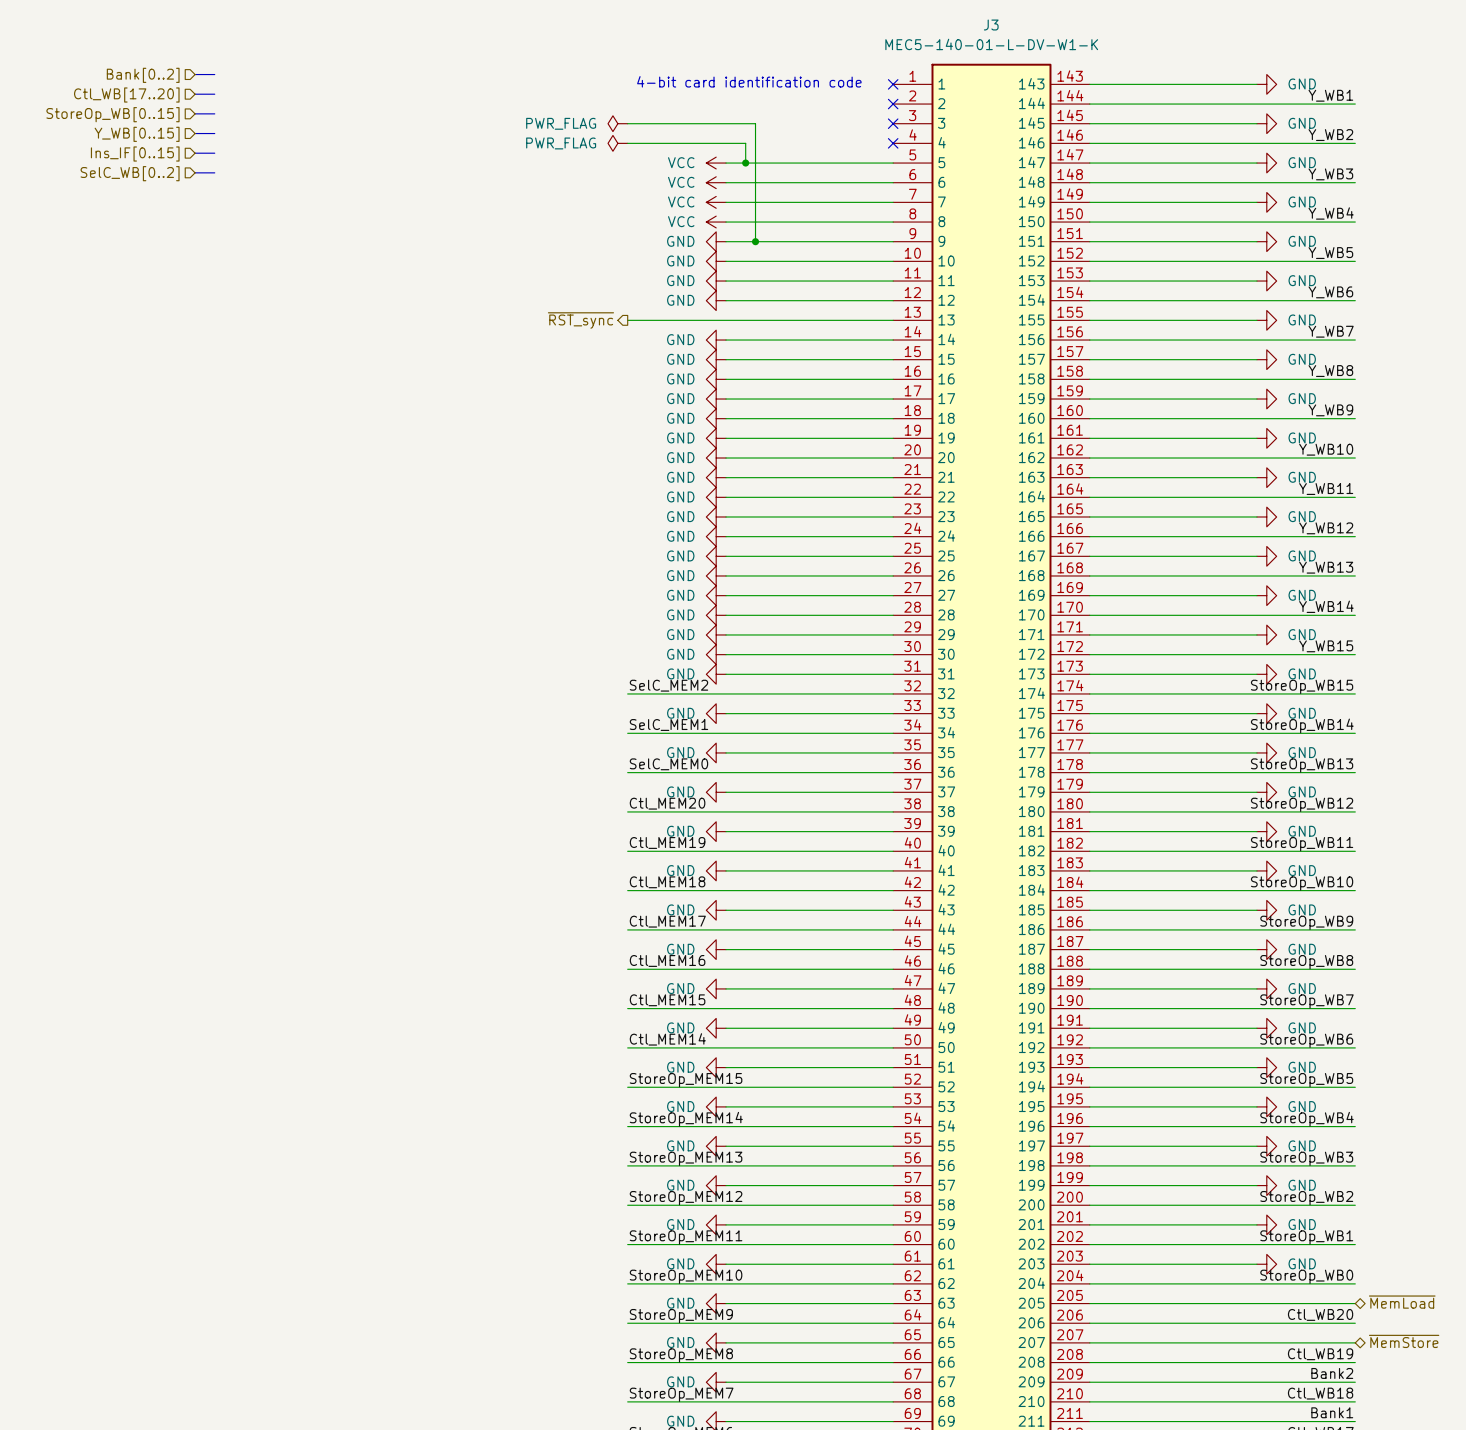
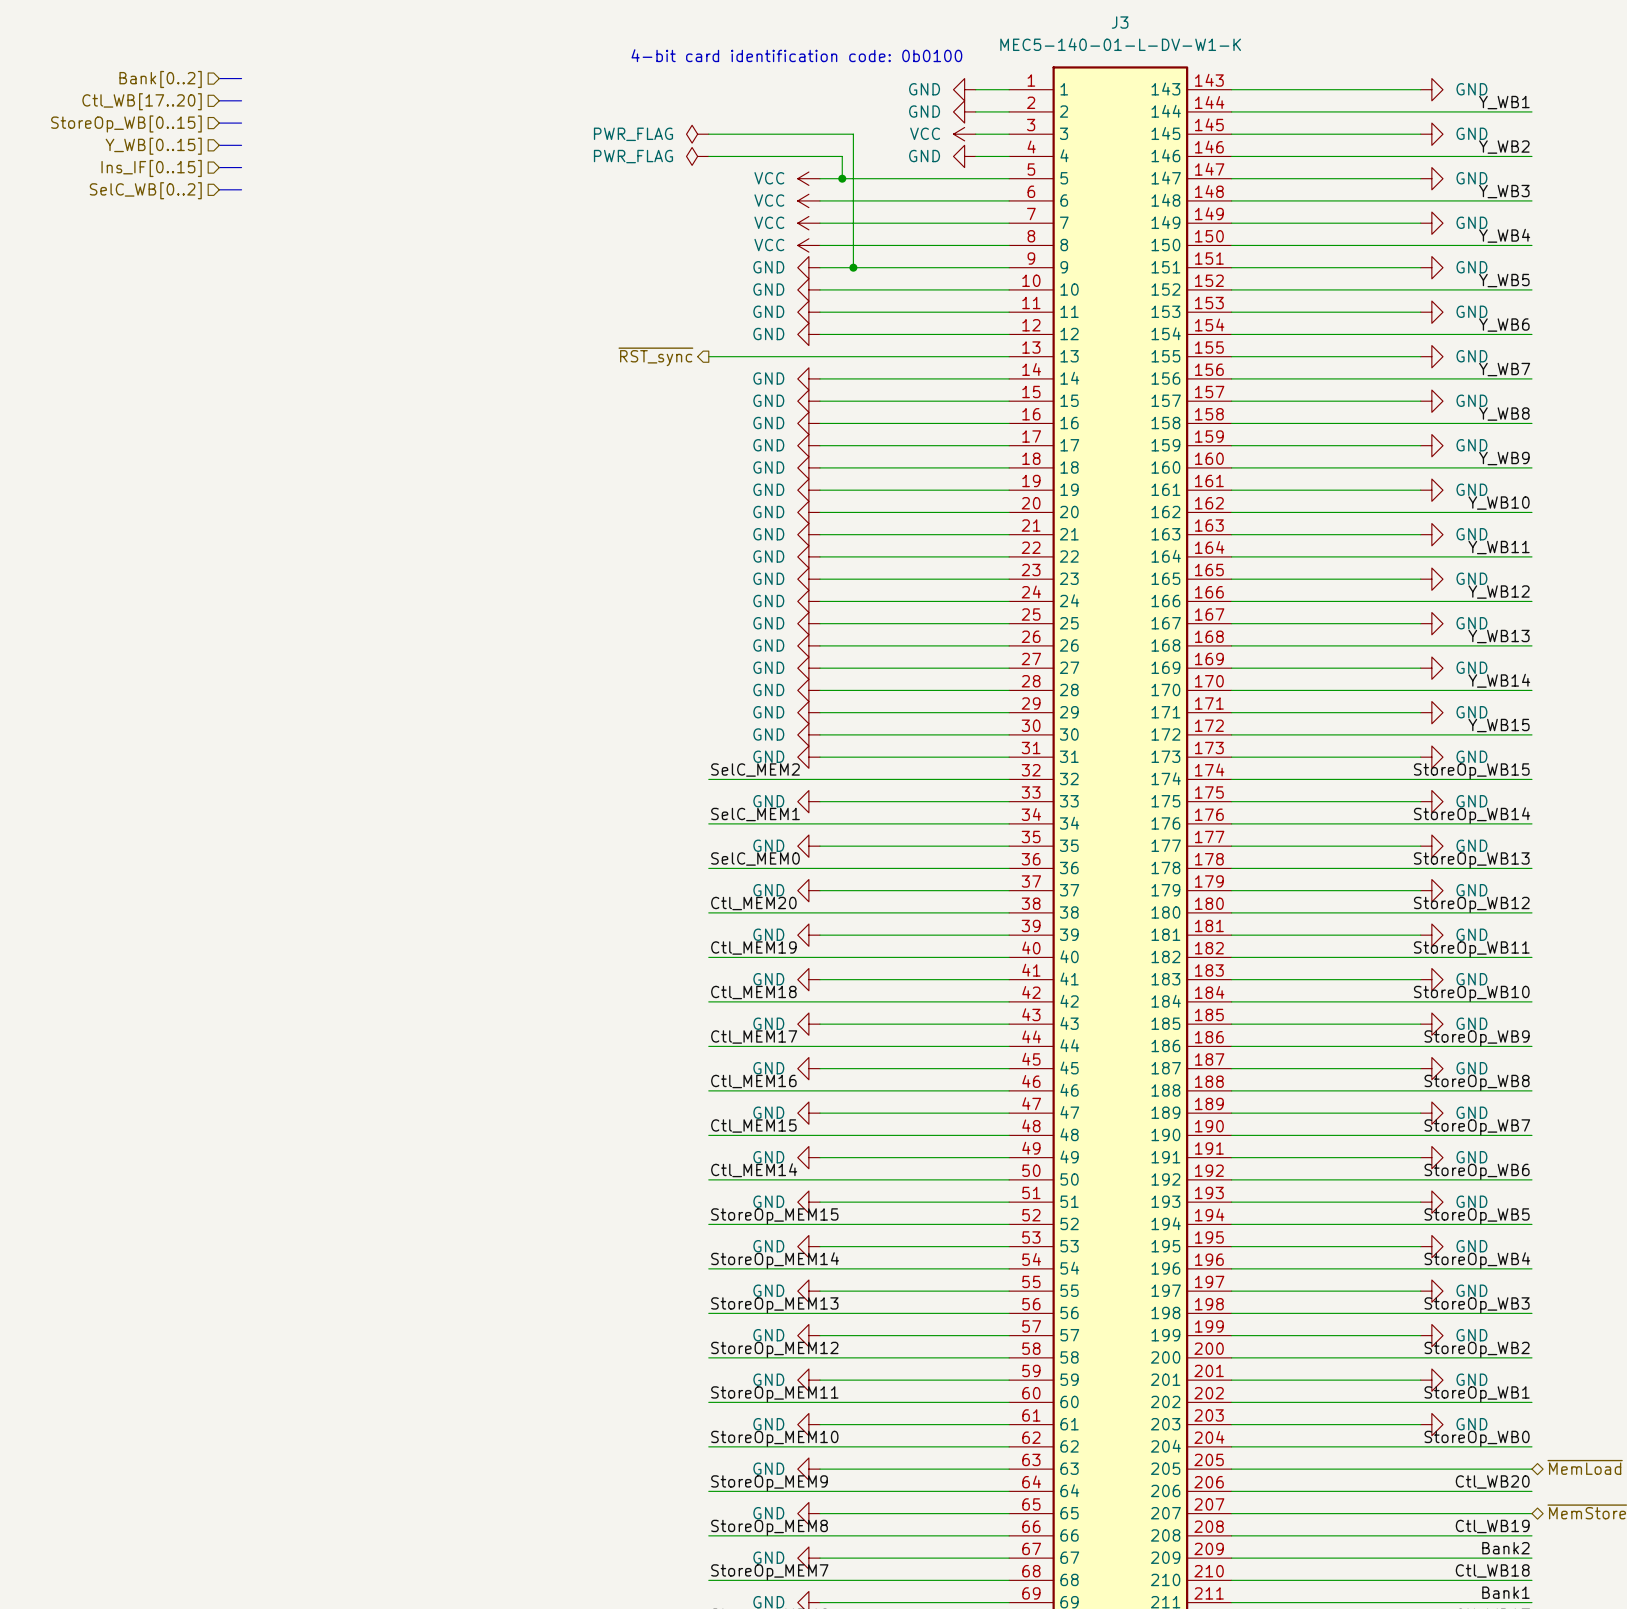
text: none -> 4-bit card identification code: 0b0100 (796, 55)
text: 4-bit card identification code (749, 81) -> none
power symbol: none -> GND (964, 89)
wire: none -> (975, 89) (1009, 89)
no-connect mark: (893, 84) -> none
power symbol: none -> GND (964, 111)
wire: none -> (975, 111) (1009, 111)
no-connect mark: (893, 104) -> none
power symbol: none -> VCC (964, 134)
wire: none -> (975, 134) (1009, 134)
no-connect mark: (893, 123) -> none
power symbol: none -> GND (964, 156)
wire: none -> (975, 156) (1009, 156)
no-connect mark: (893, 143) -> none

